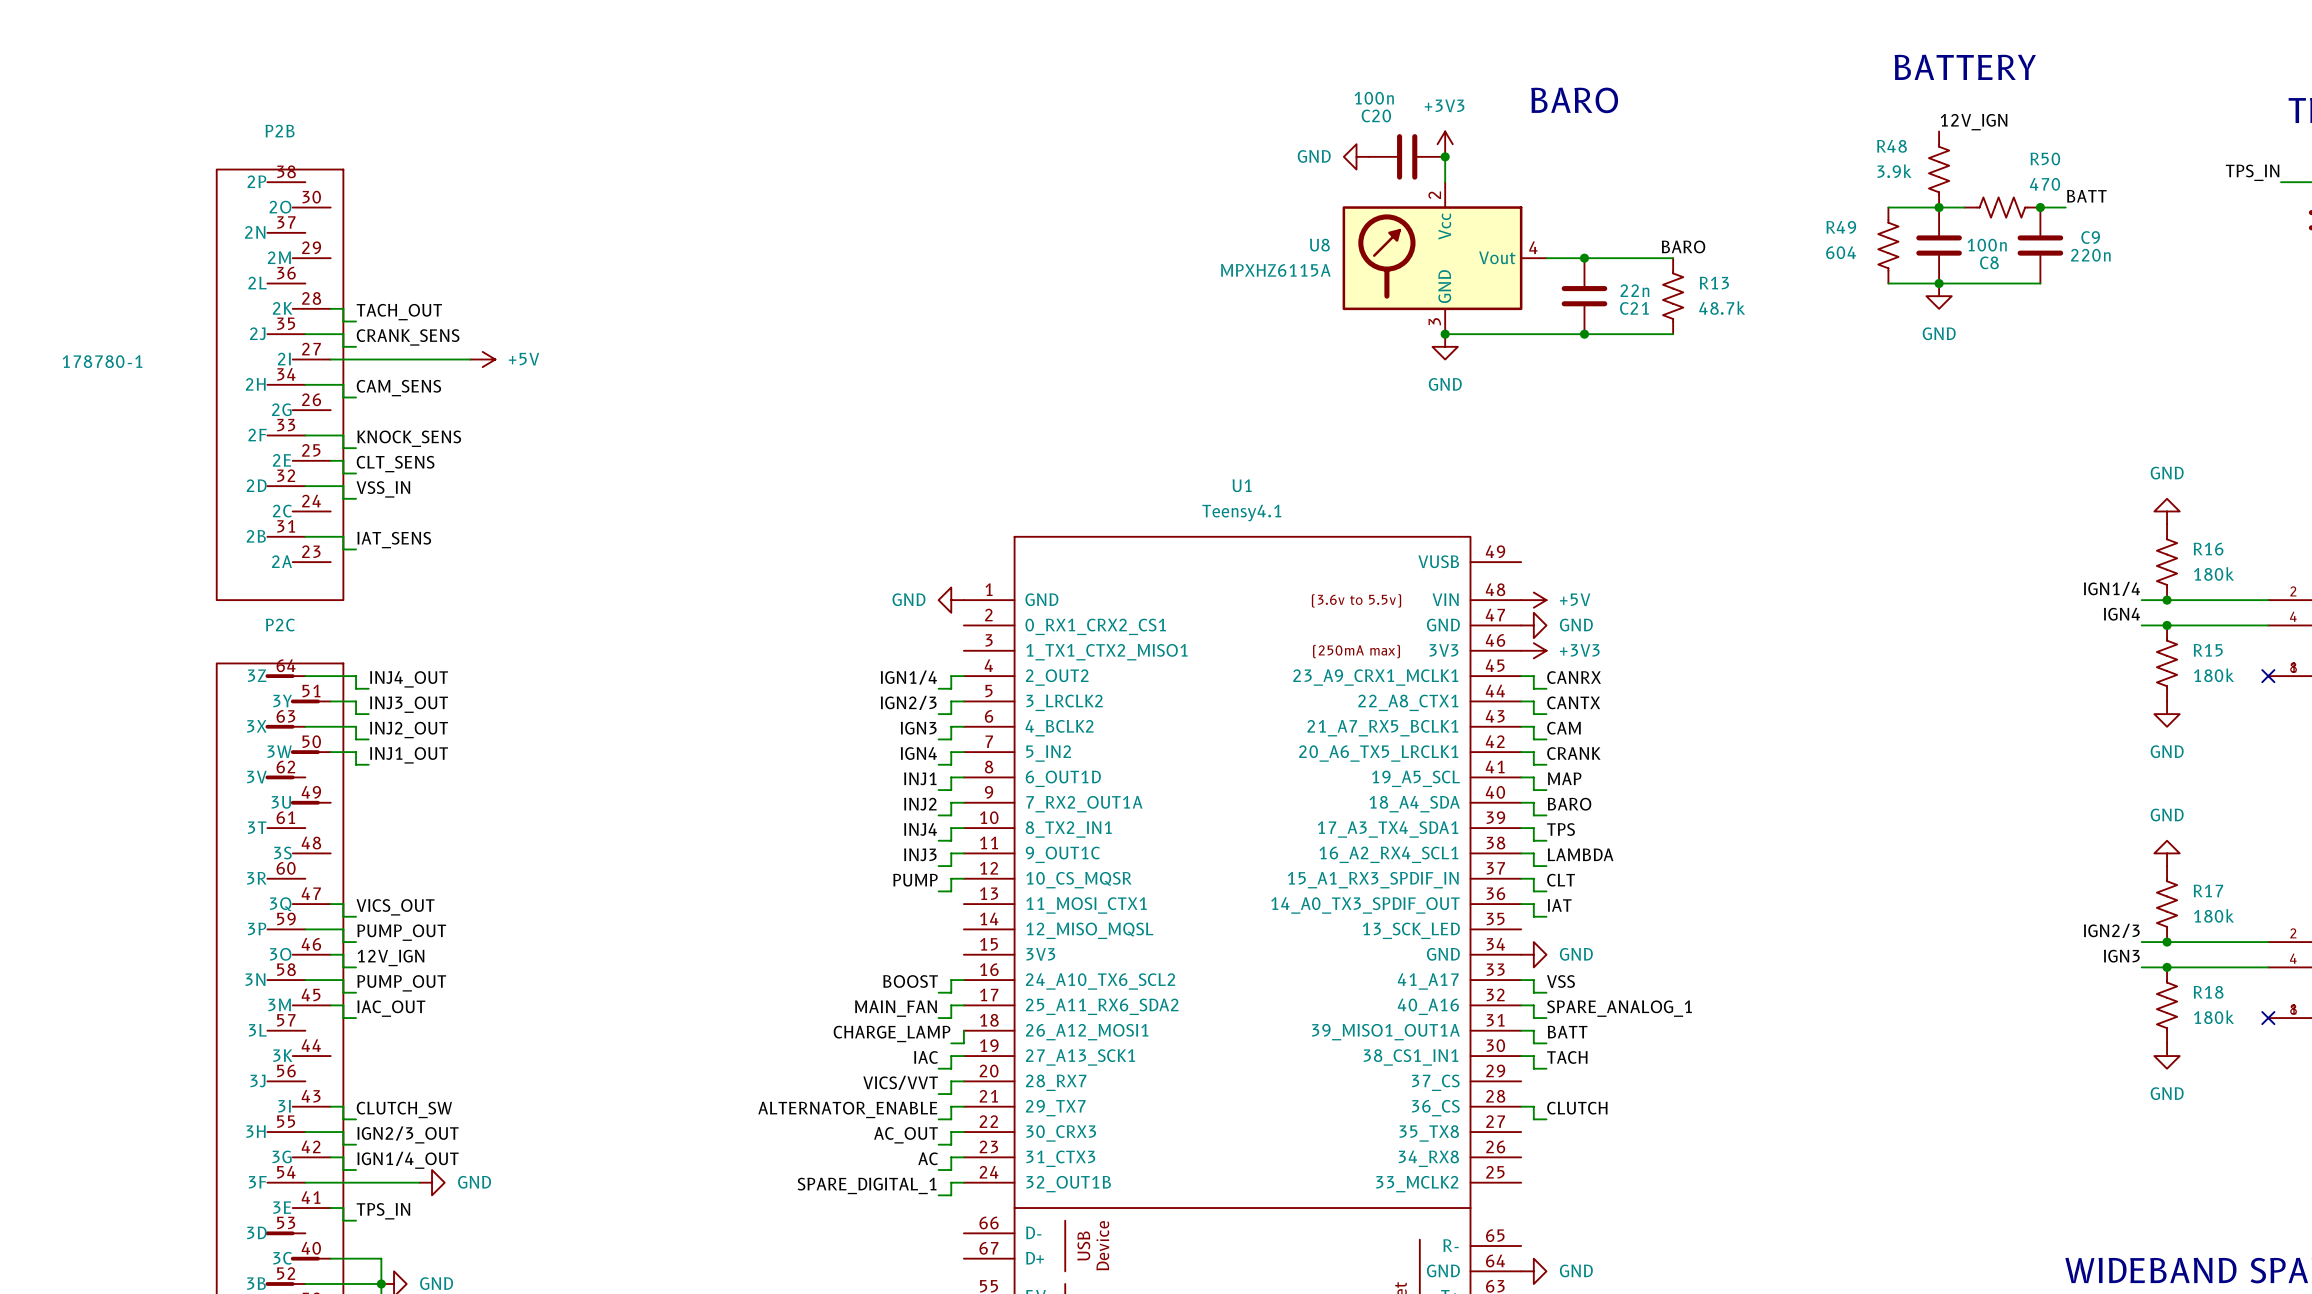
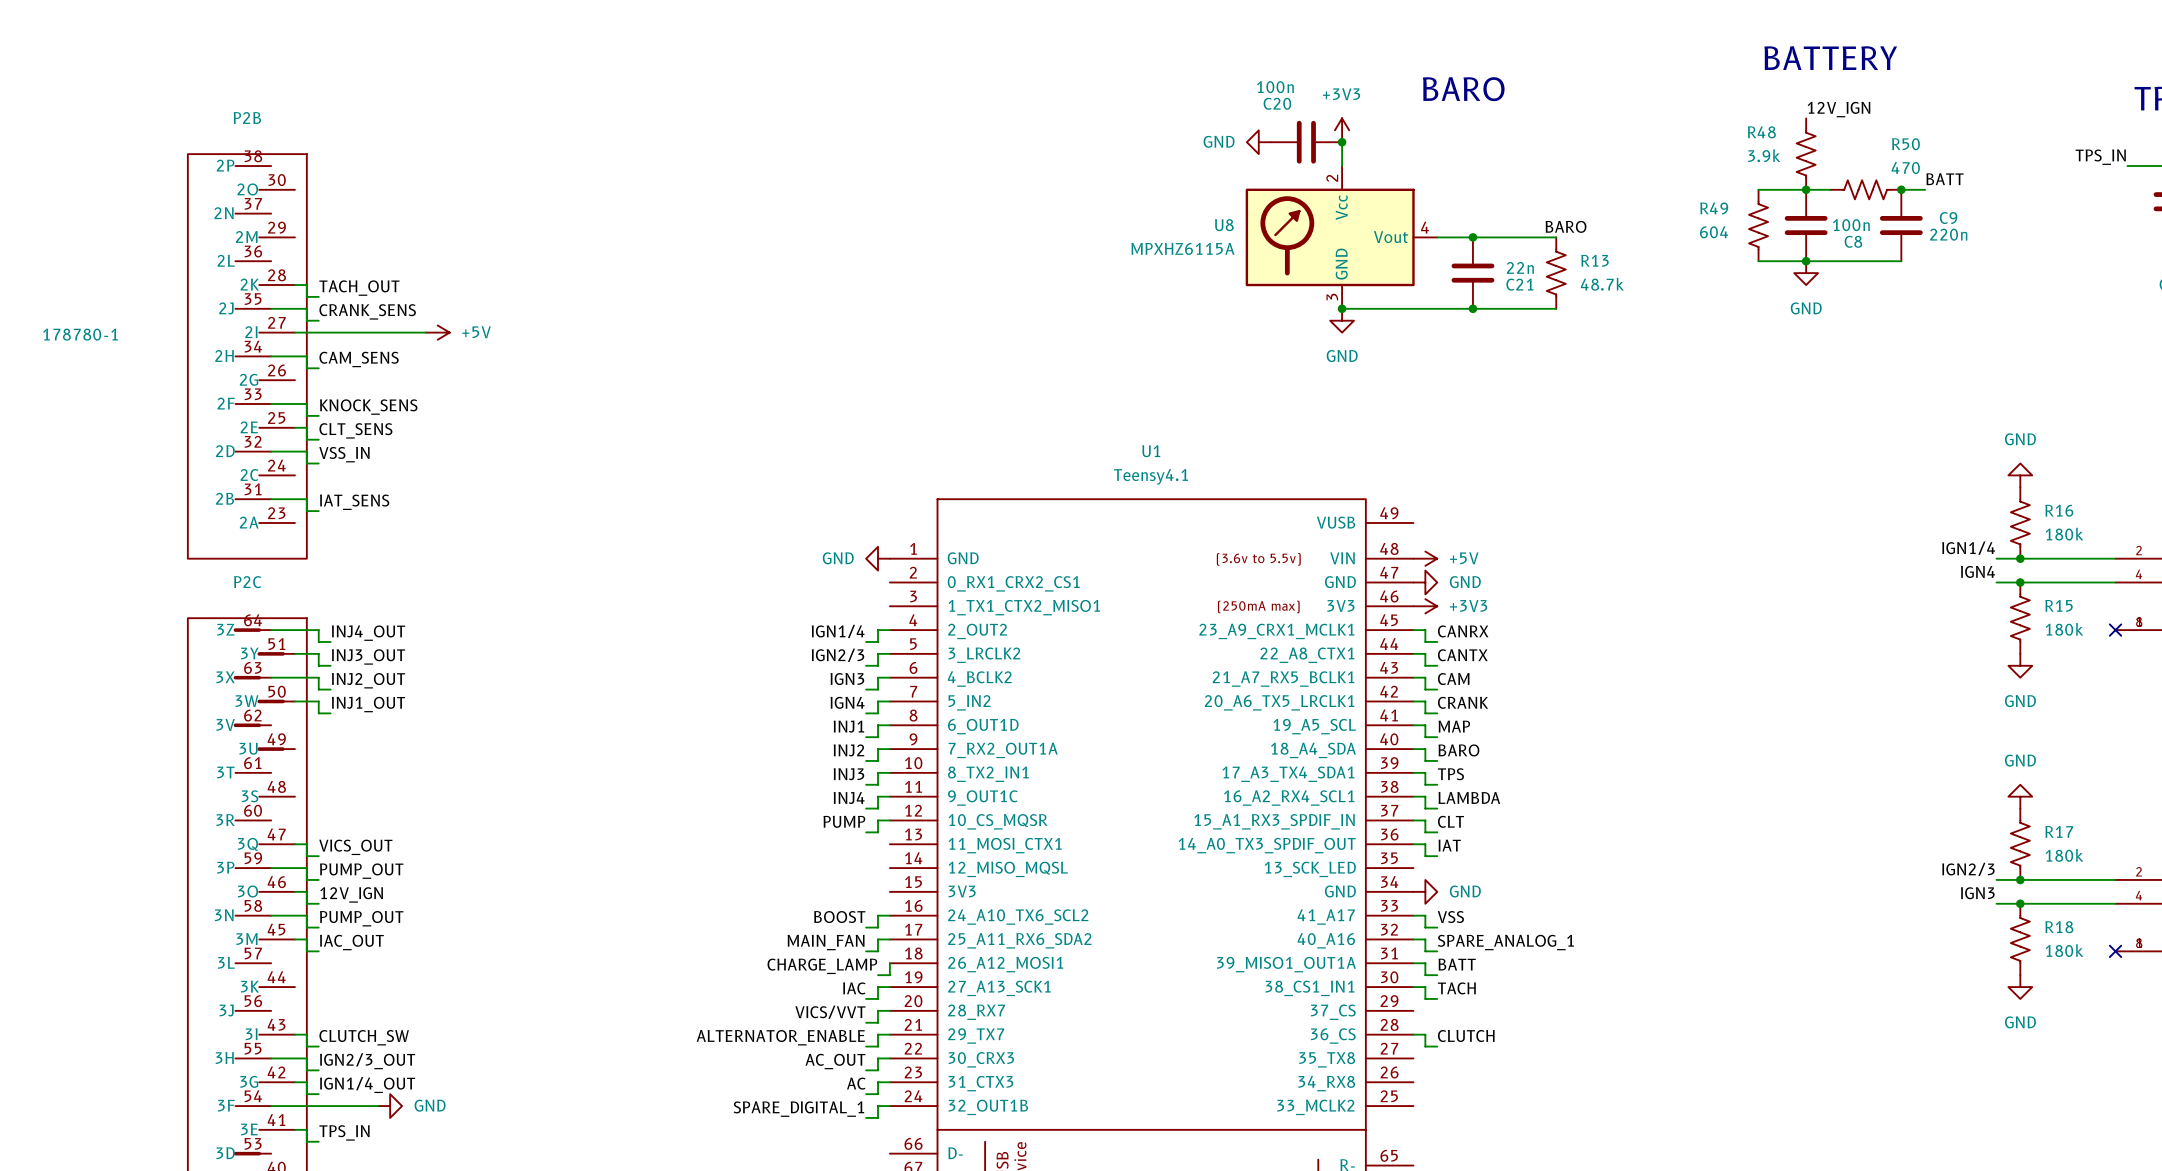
label: INJ4 (920, 829) -> INJ3 (848, 774)
label: INJ3 (920, 854) -> INJ4 (849, 798)

